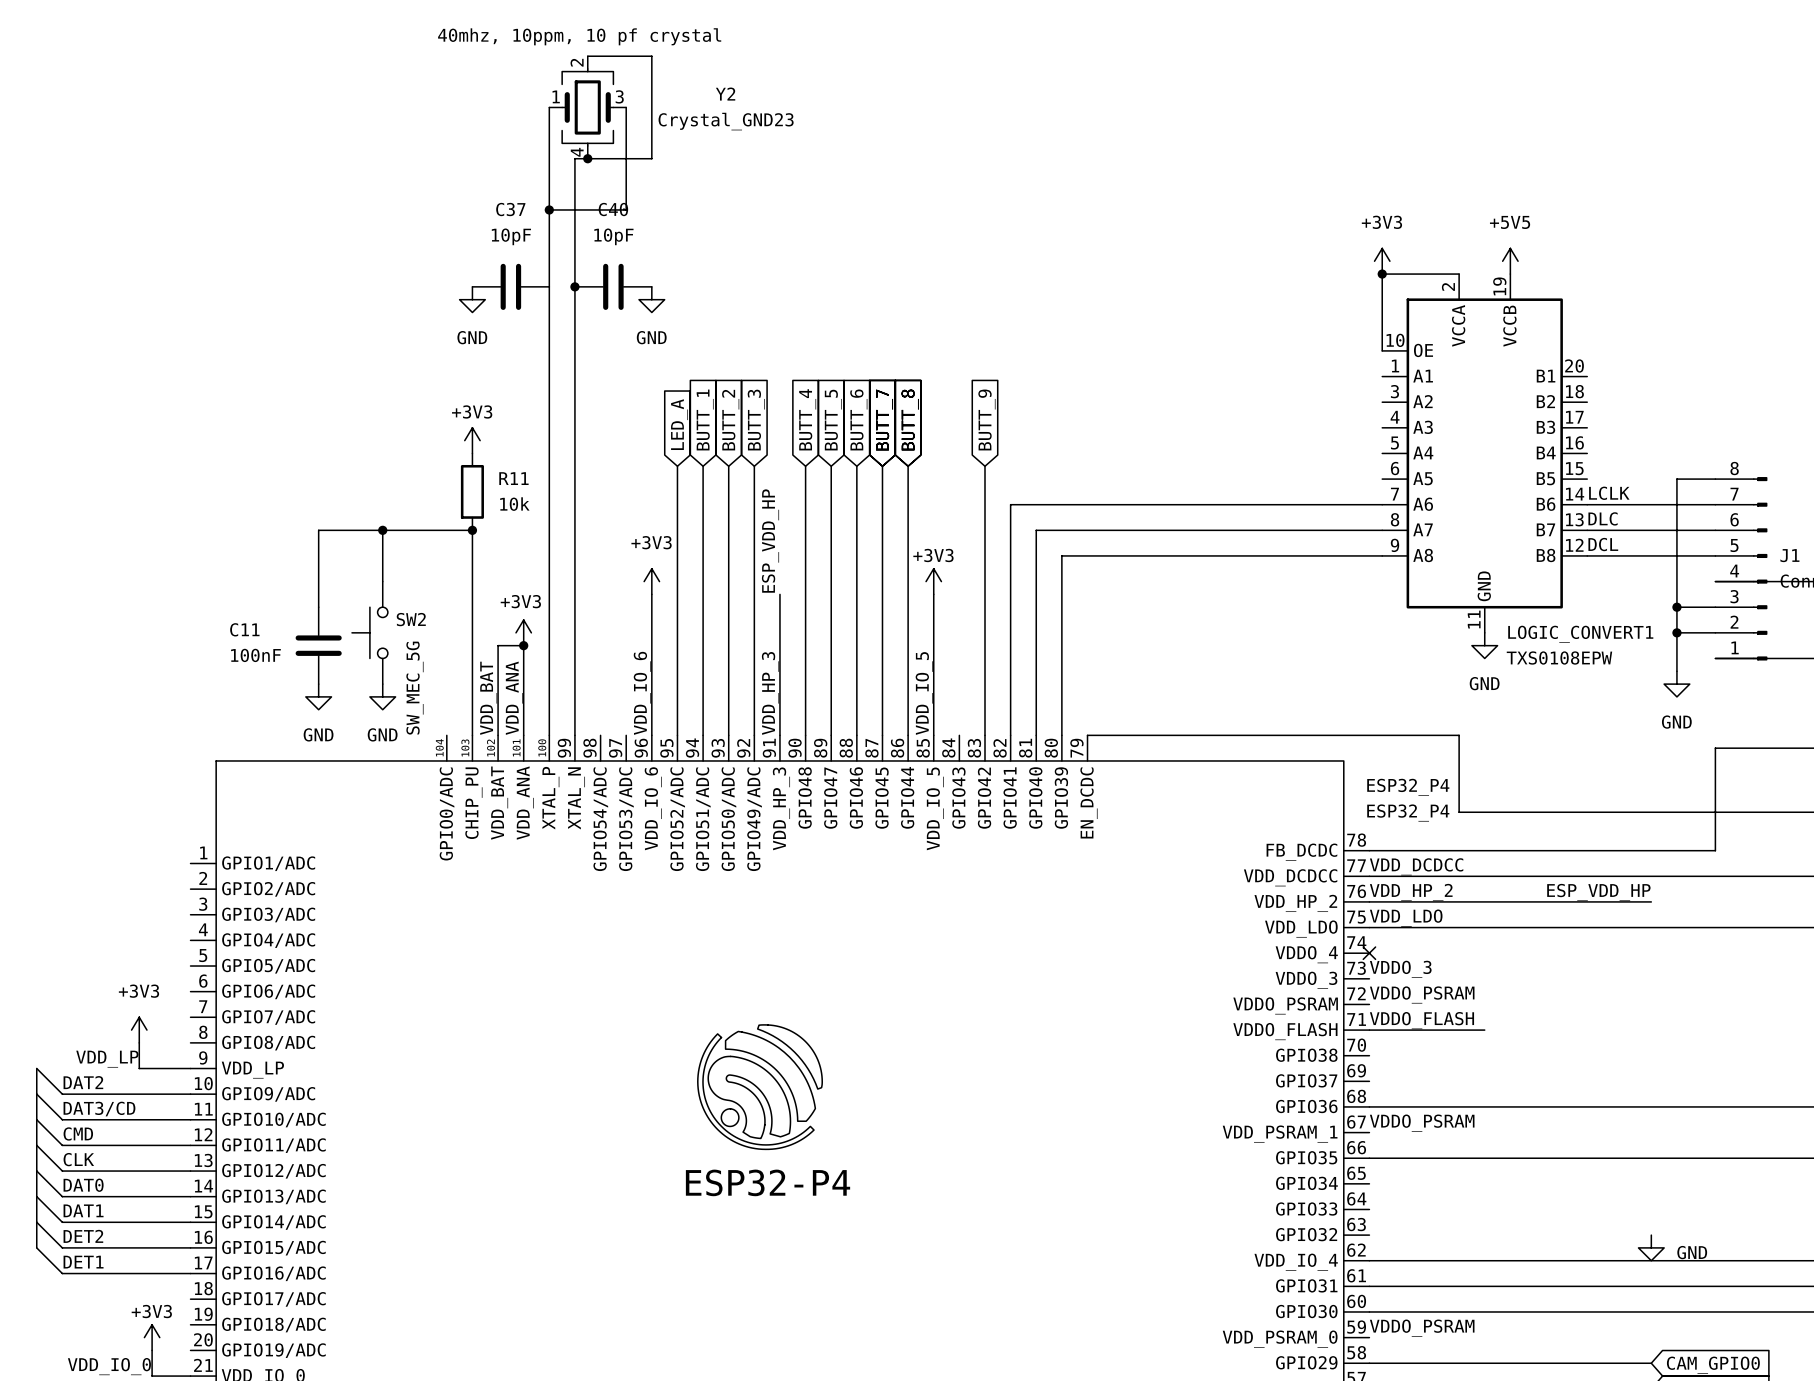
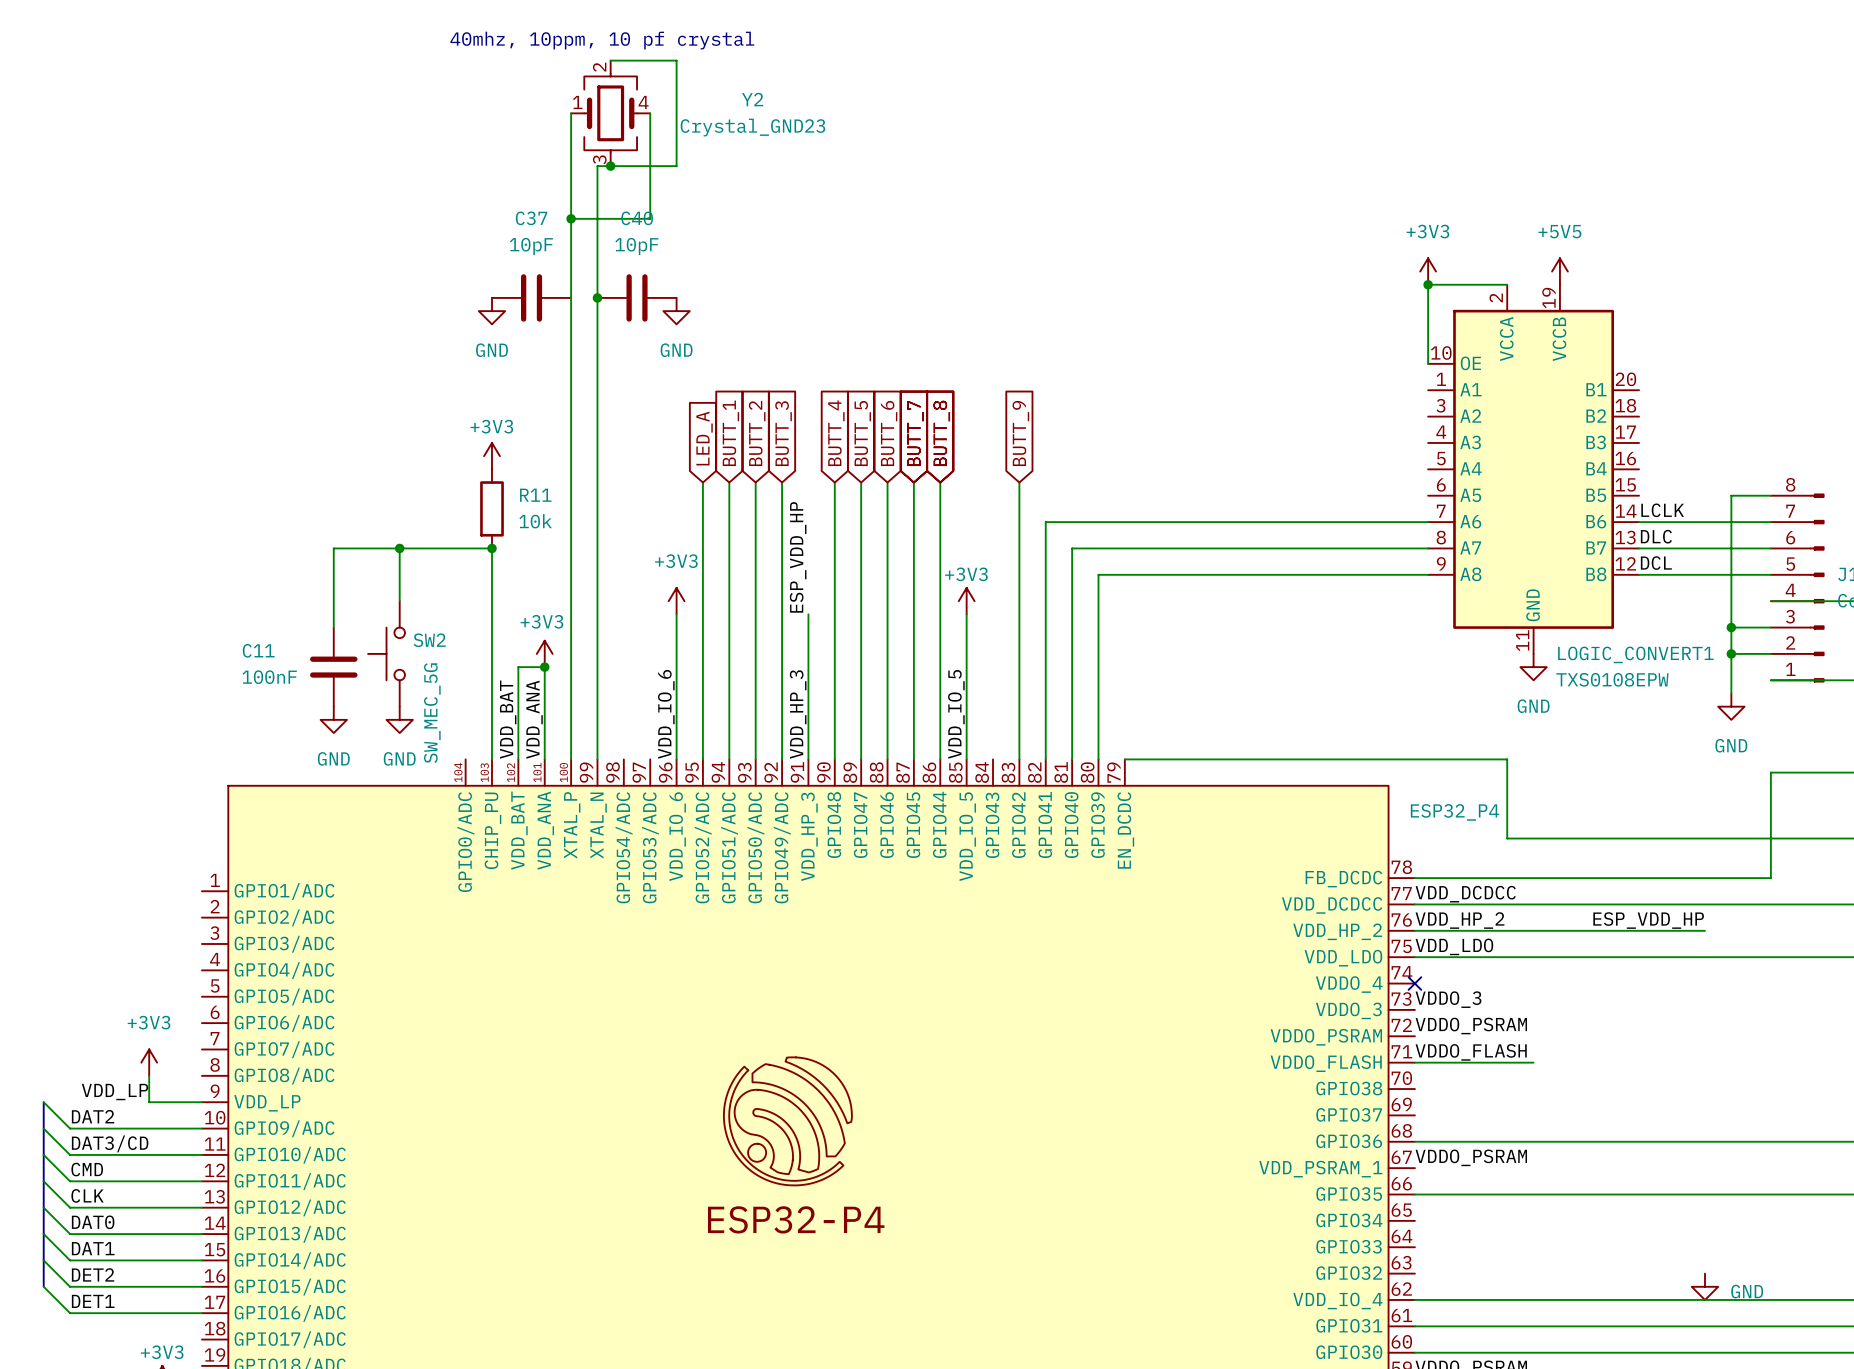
Y2 pin number: 3 (619, 96) -> 4 (643, 102)
Y2 pin number: 4 (577, 152) -> 3 (599, 159)
ESP32_P4 value: ESP32_P4 (1408, 813) -> none

